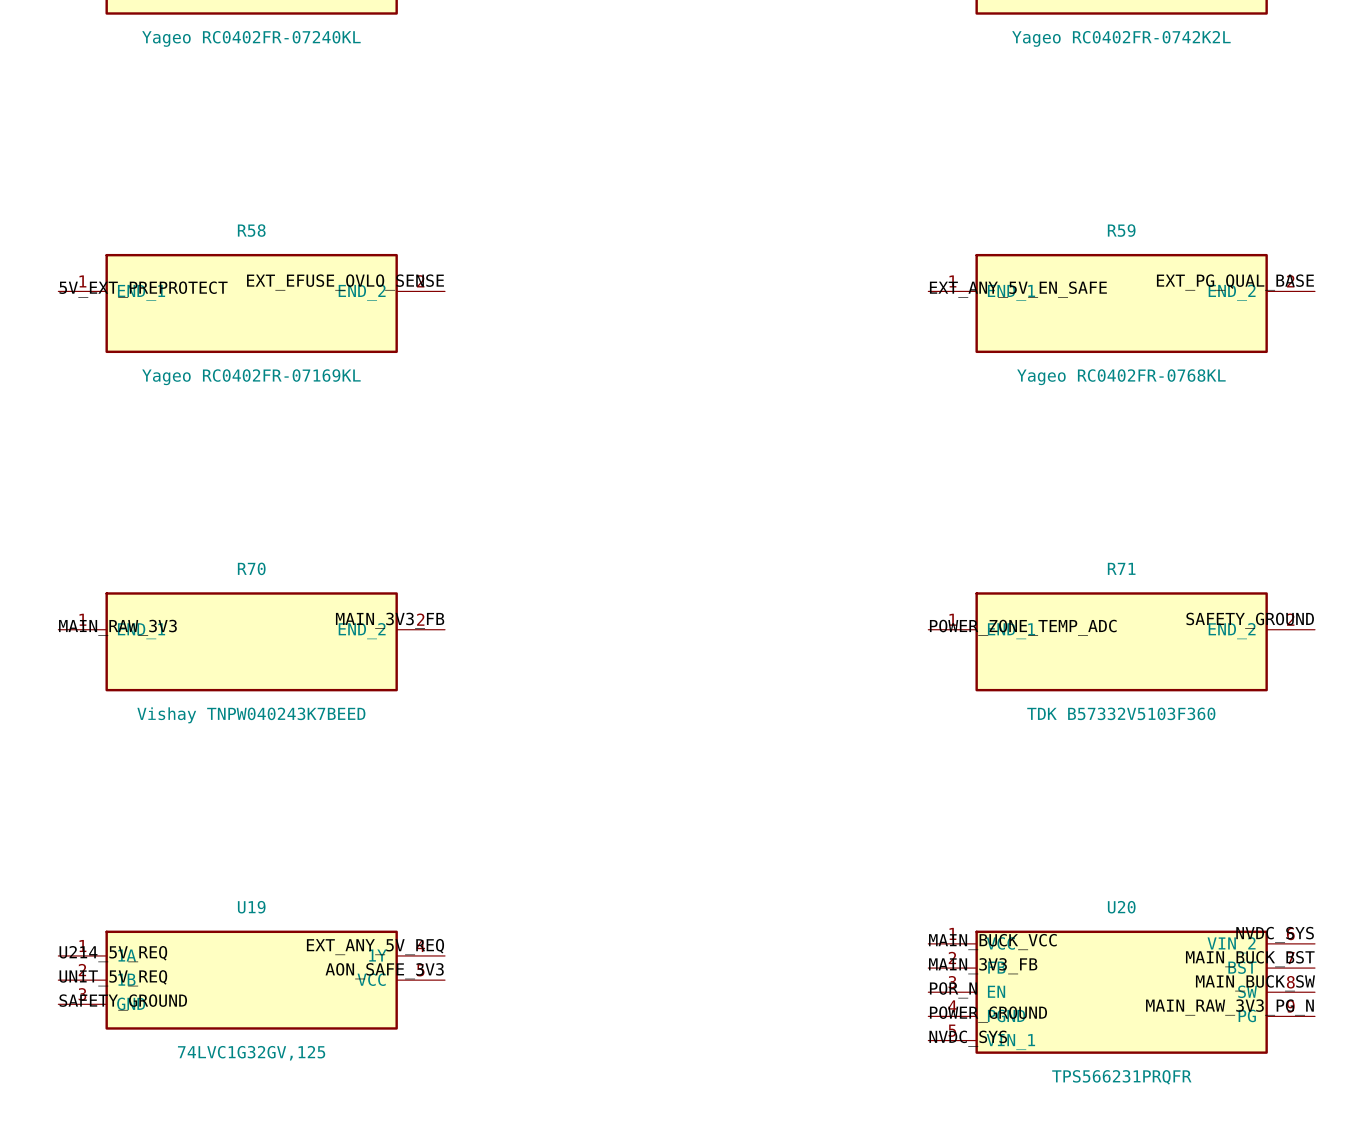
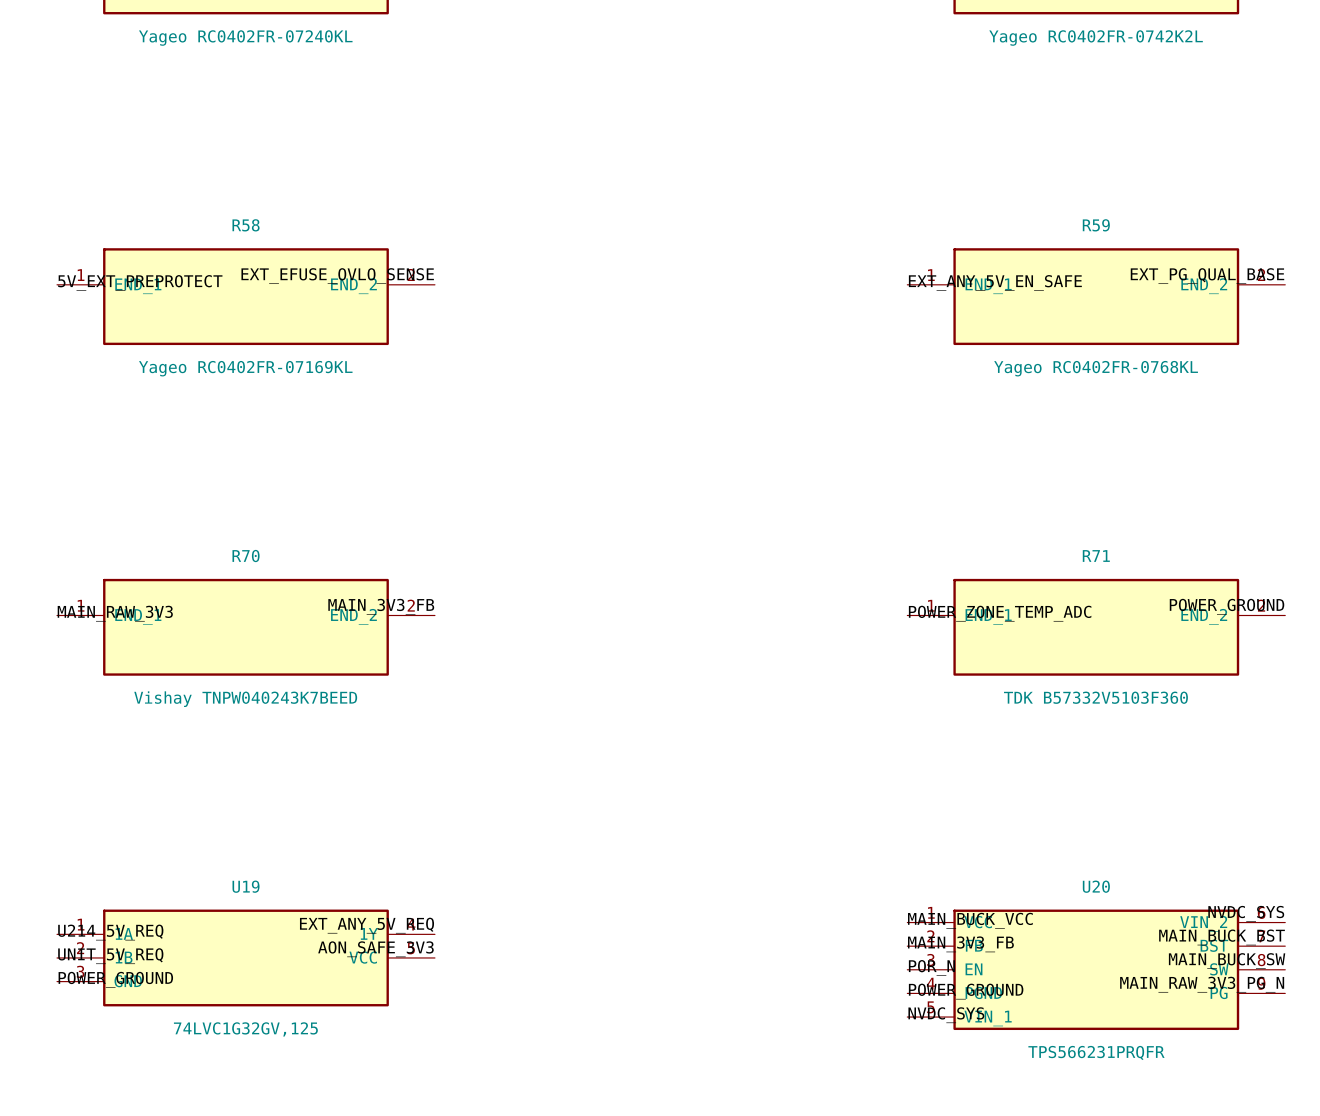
label: SAFETY_GROUND (1250, 620) -> POWER_GROUND (1227, 606)
label: SAFETY_GROUND (123, 1002) -> POWER_GROUND (115, 979)

